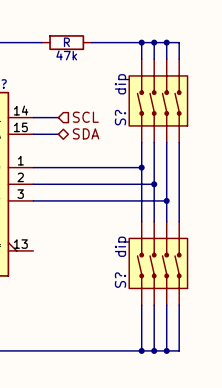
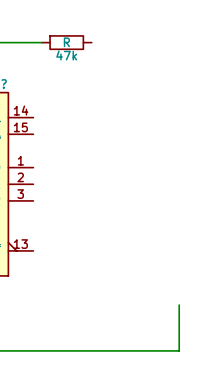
wire: (91, 42) (179, 42) (179, 59) -> none
wire: (141, 42) (141, 59) -> none
junction: (141, 42) -> none
wire: (154, 42) (154, 59) -> none
junction: (154, 42) -> none
wire: (166, 42) (166, 59) -> none
junction: (166, 42) -> none
S?: dip (158, 100) -> none
wire: (33, 117) (58, 117) -> none
hierarchical label: SCL (85, 117) -> none
hierarchical label: SDA (86, 133) -> none
wire: (33, 134) (58, 134) -> none
wire: (141, 142) (141, 221) -> none
wire: (154, 142) (154, 221) -> none
wire: (166, 142) (166, 221) -> none
wire: (179, 142) (179, 221) -> none
wire: (33, 167) (141, 167) -> none
junction: (141, 167) -> none
wire: (33, 184) (154, 184) -> none
junction: (154, 184) -> none
wire: (33, 200) (166, 200) -> none
junction: (166, 200) -> none
S?: dip (158, 263) -> none
wire: (141, 305) (141, 350) -> none
wire: (154, 305) (154, 350) -> none
wire: (166, 305) (166, 350) -> none
junction: (141, 350) -> none
junction: (154, 350) -> none
junction: (166, 350) -> none

